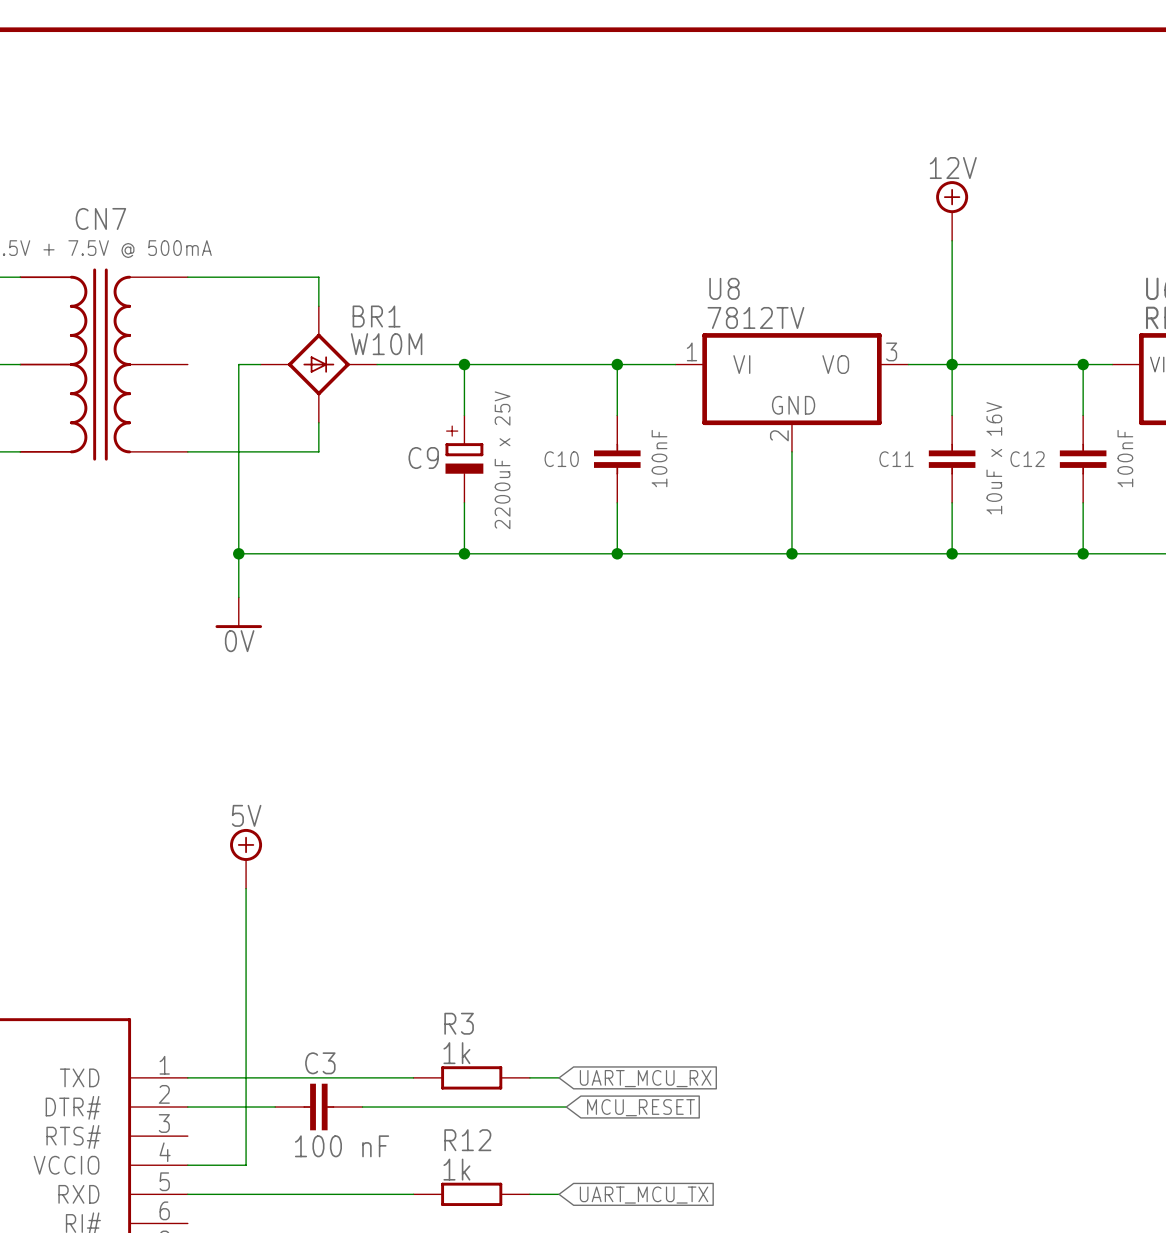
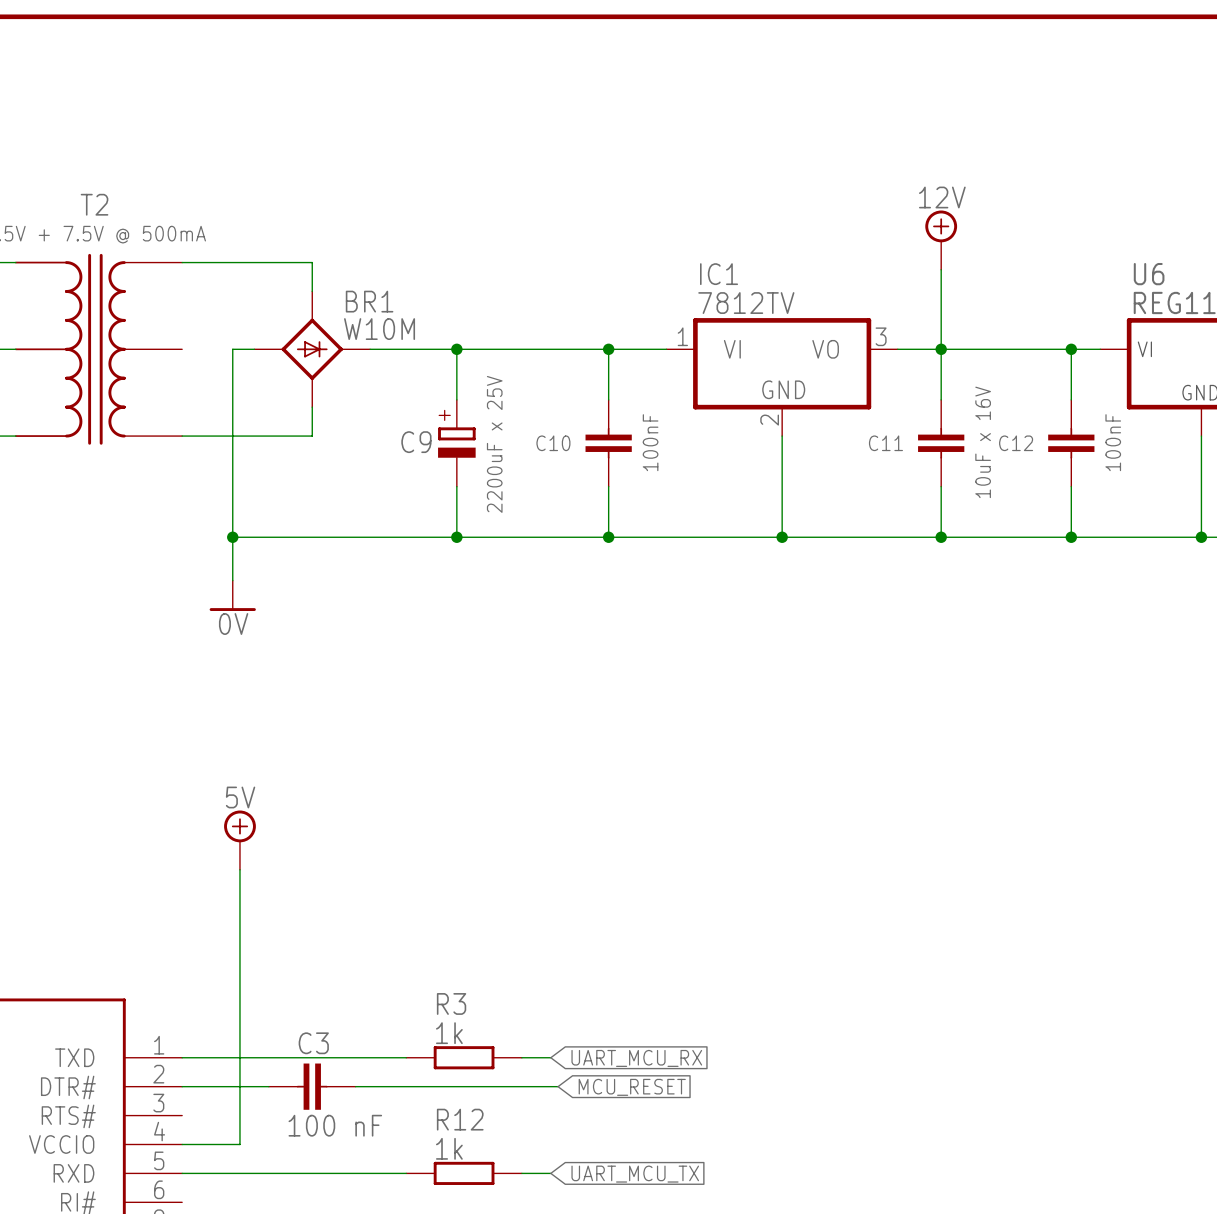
power symbol position: 12V (952, 210) -> 12V (941, 240)
CN7 name: CN7 (100, 218) -> T2 (94, 204)
U8 name: U8 (724, 288) -> IC1 (719, 274)

